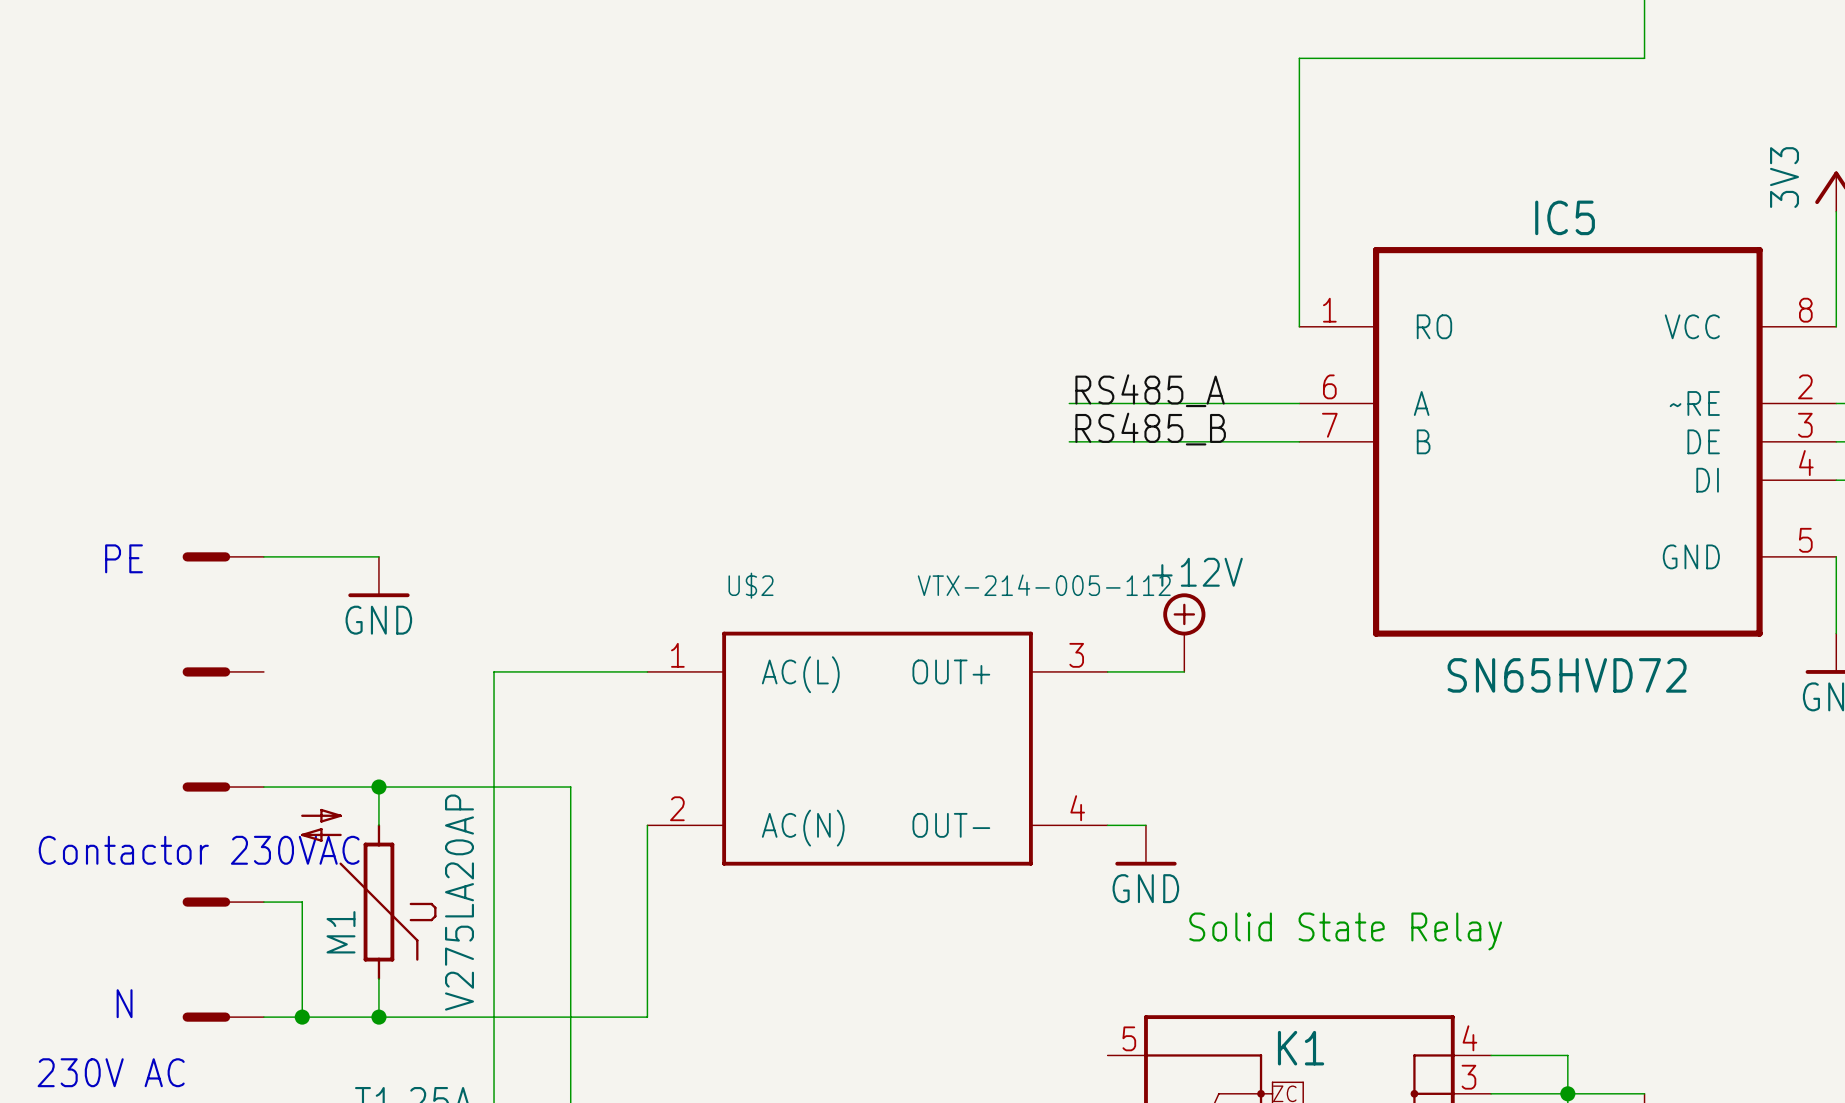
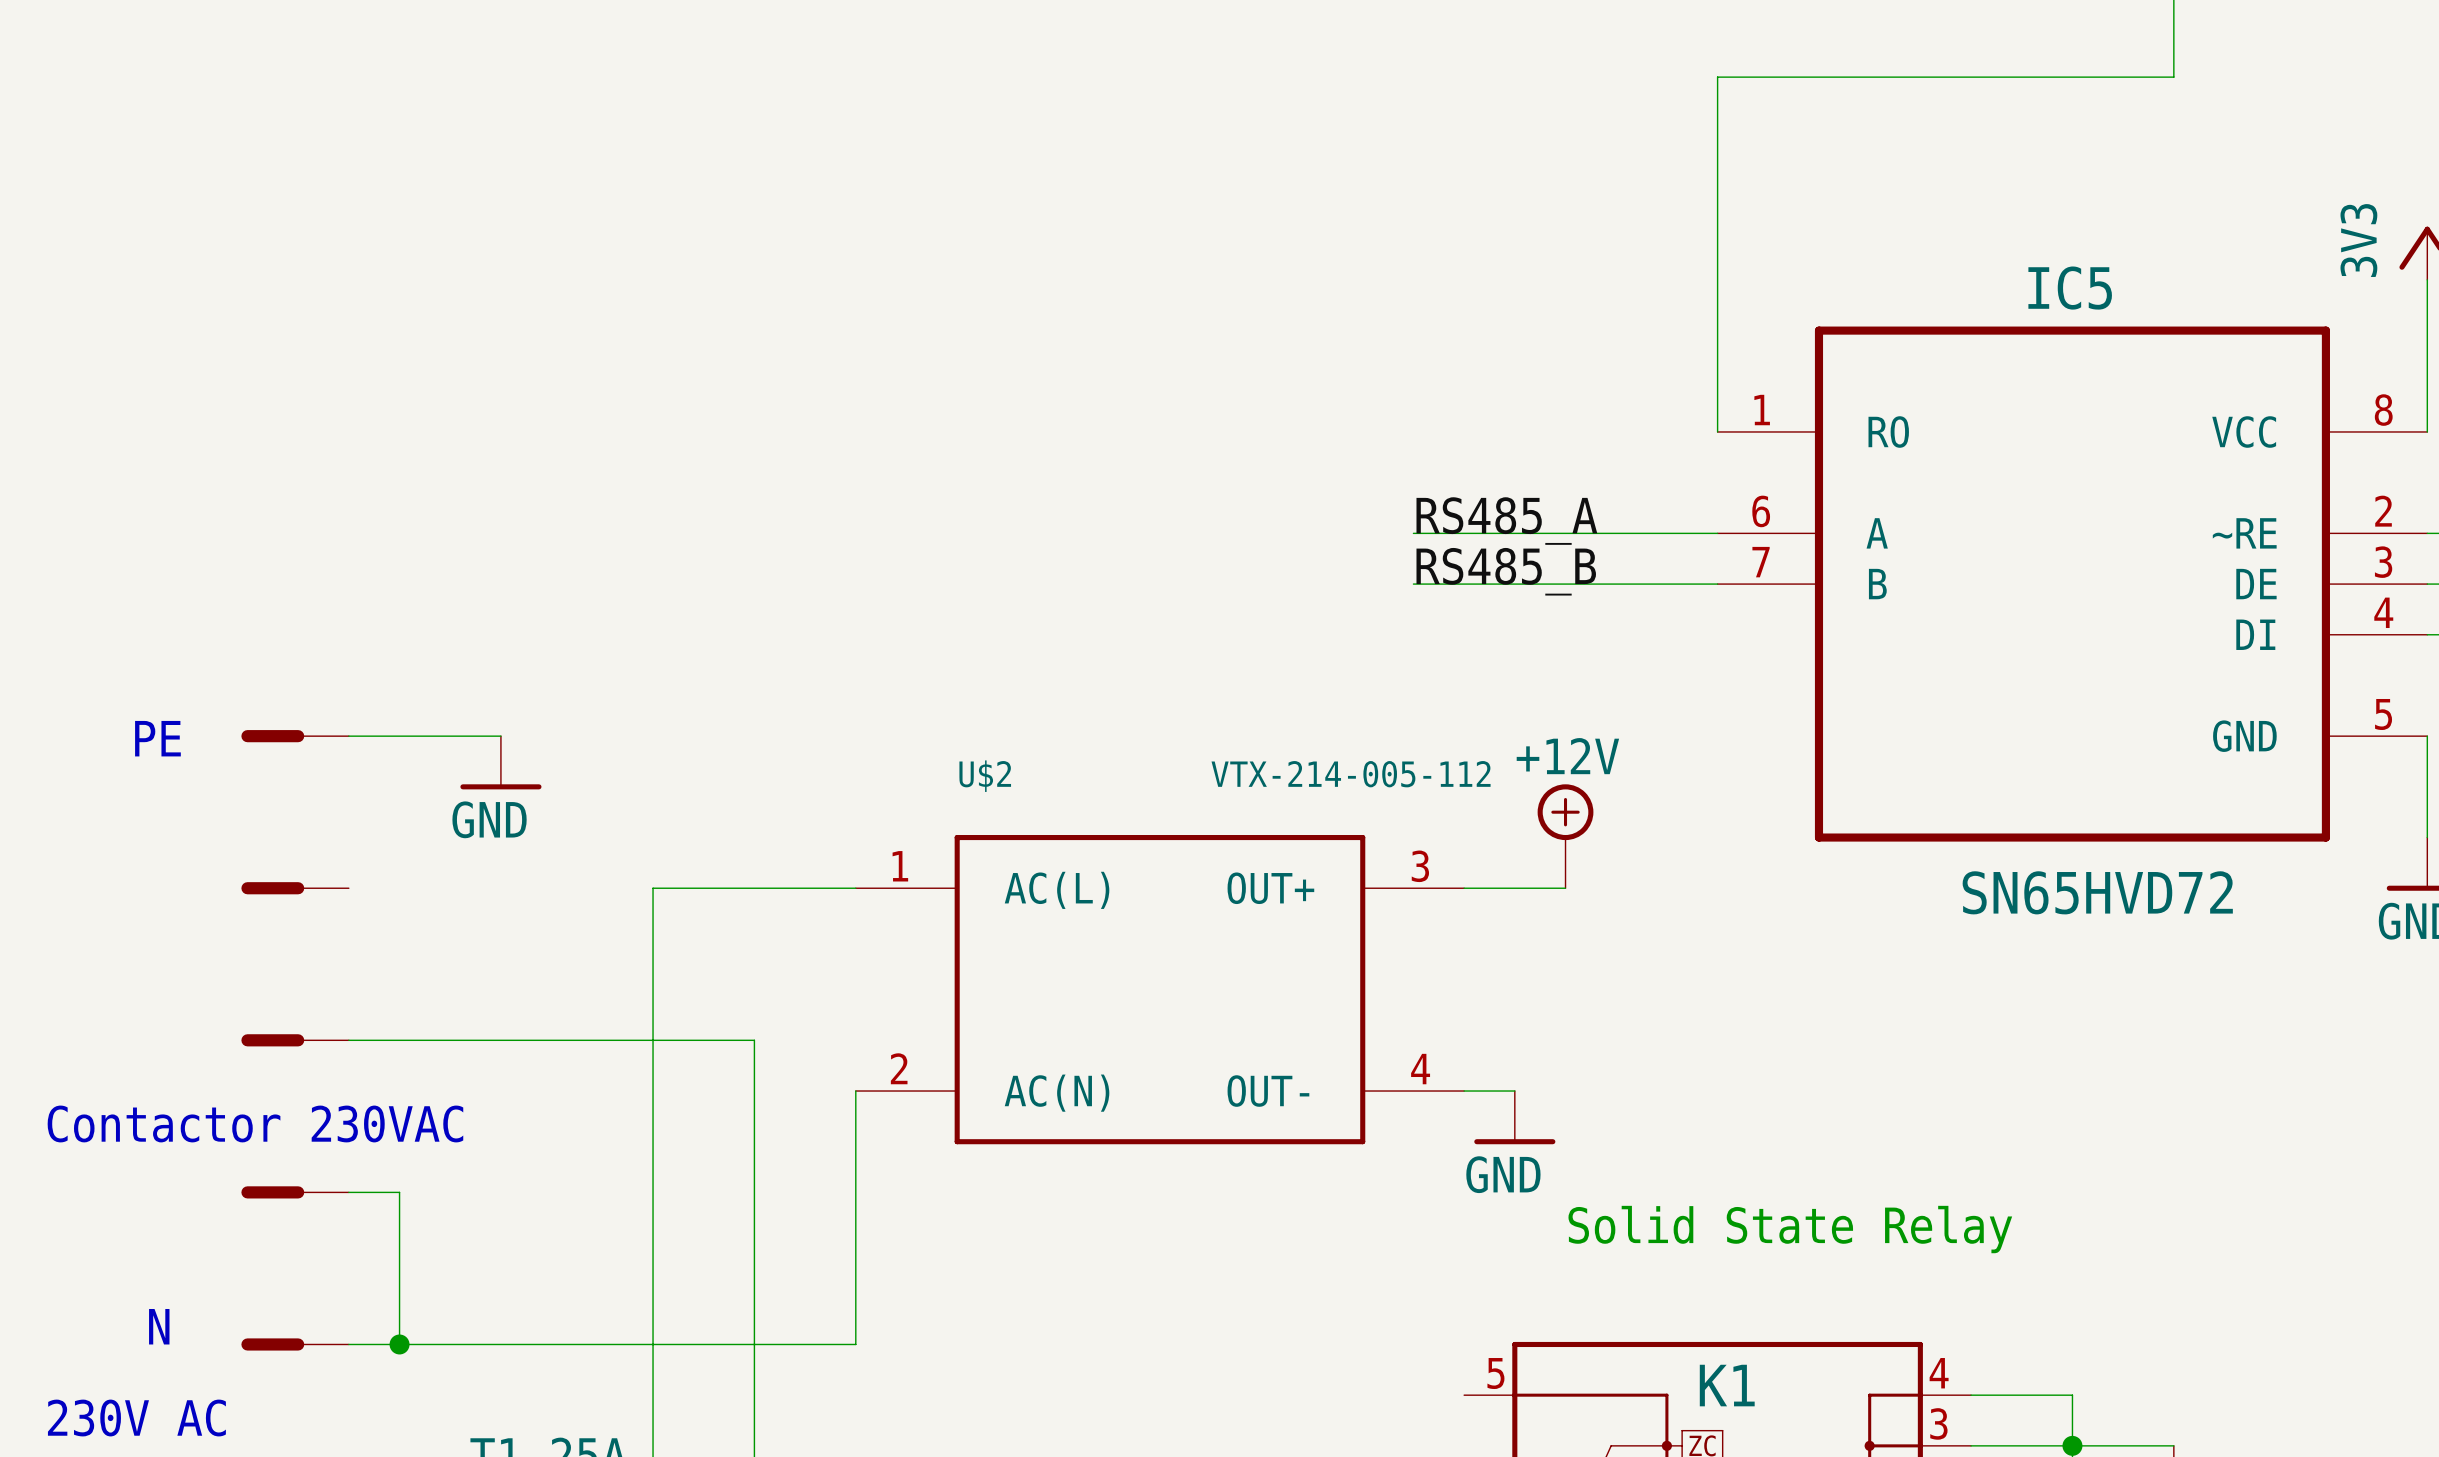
wire: (378, 787) (378, 825) -> none
junction: (378, 787) -> none
M1: V275LA20AP (368, 894) -> none
wire: (378, 978) (378, 1017) -> none
junction: (378, 1017) -> none

